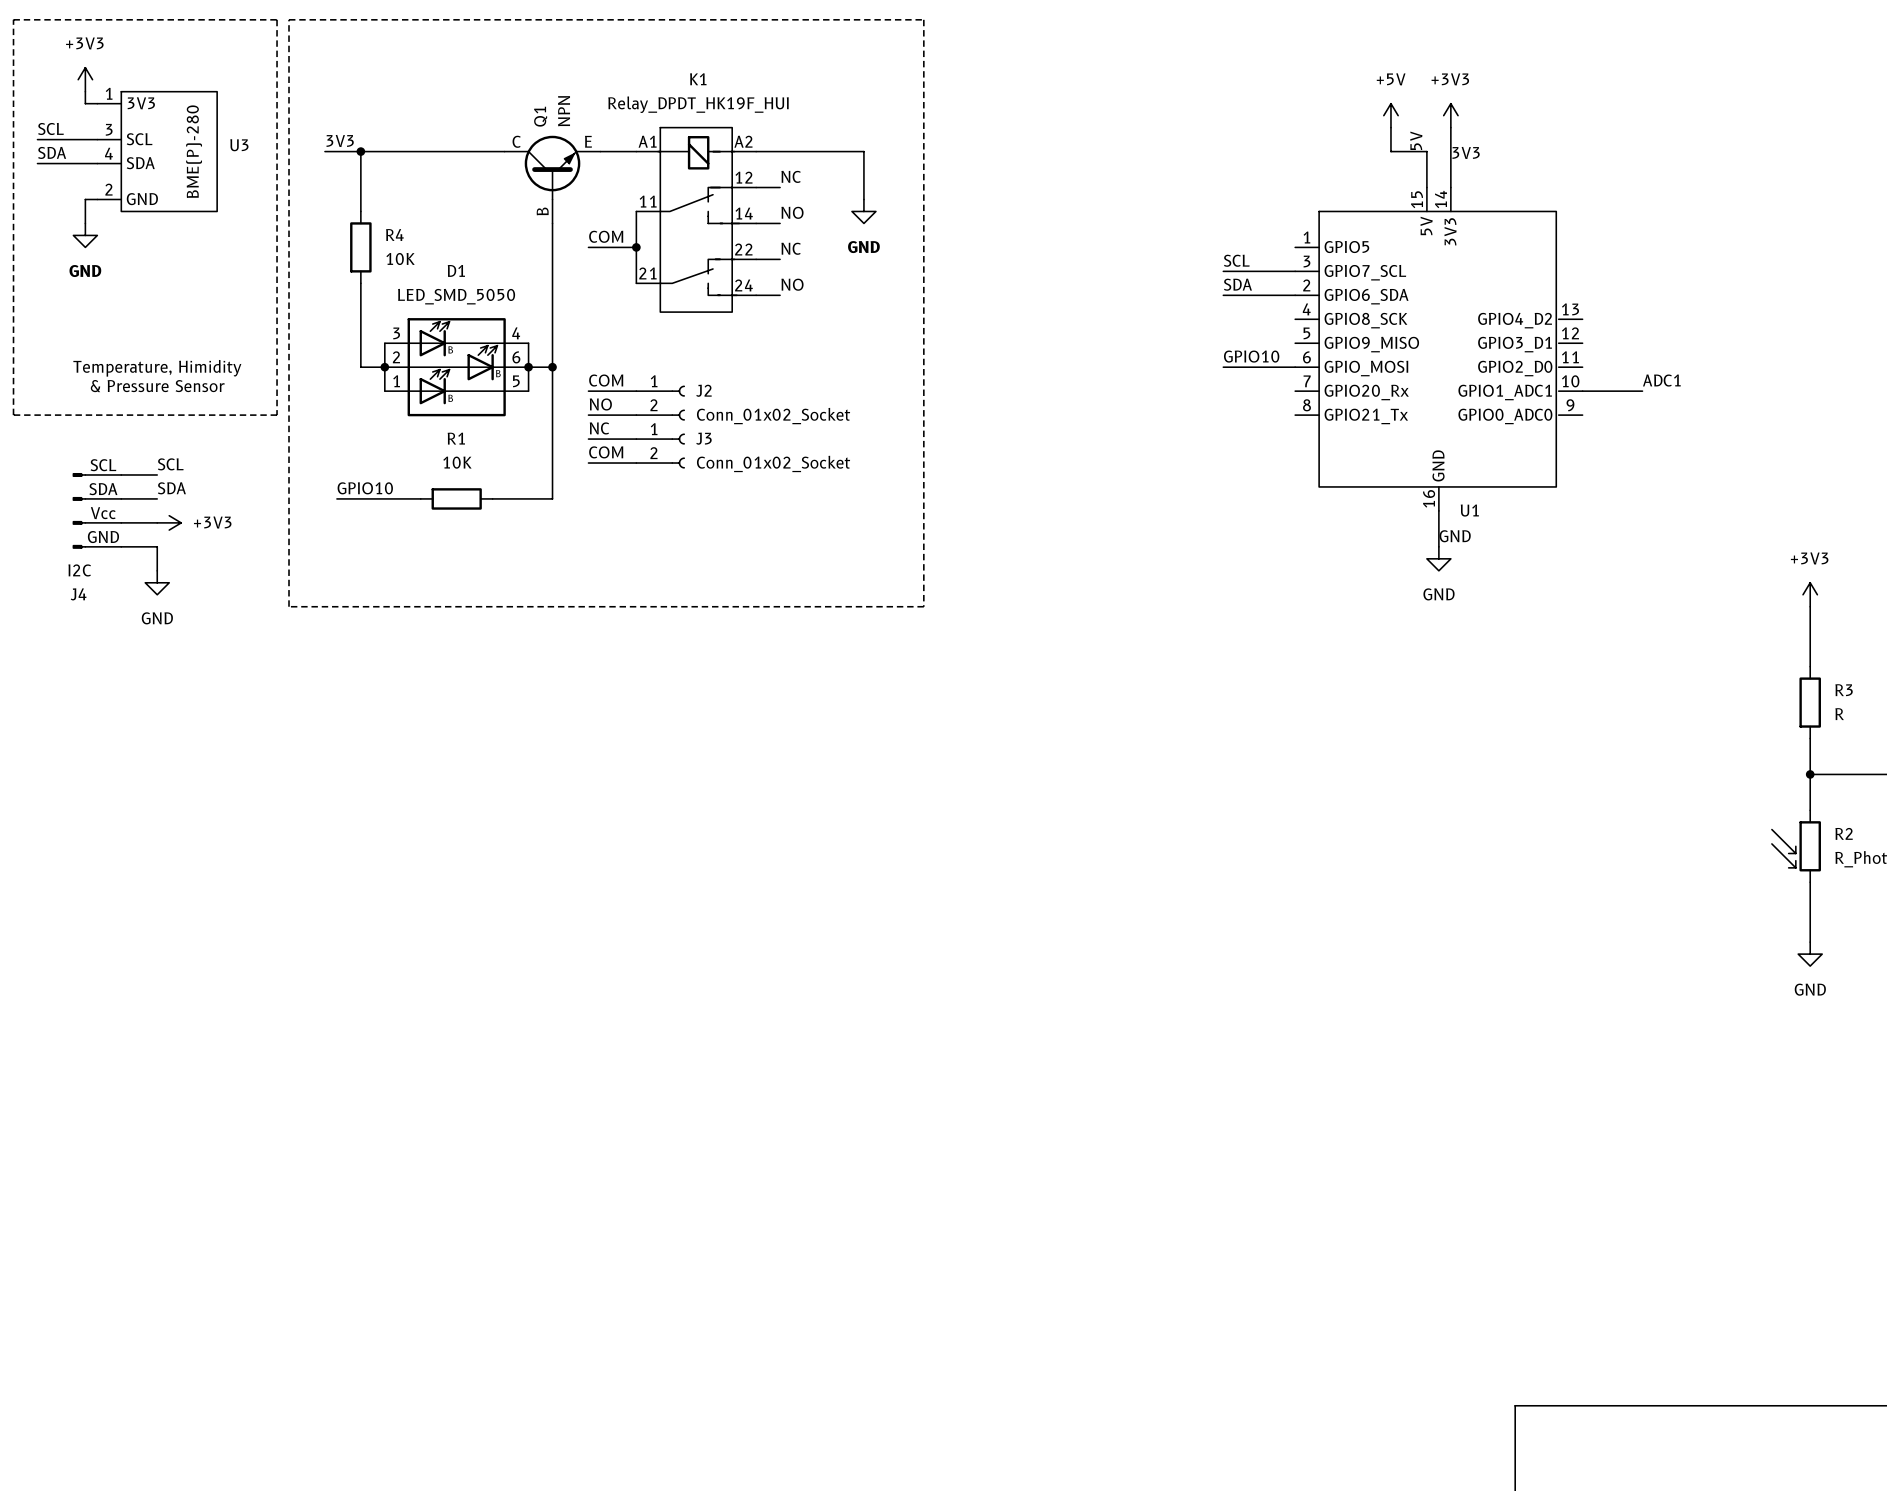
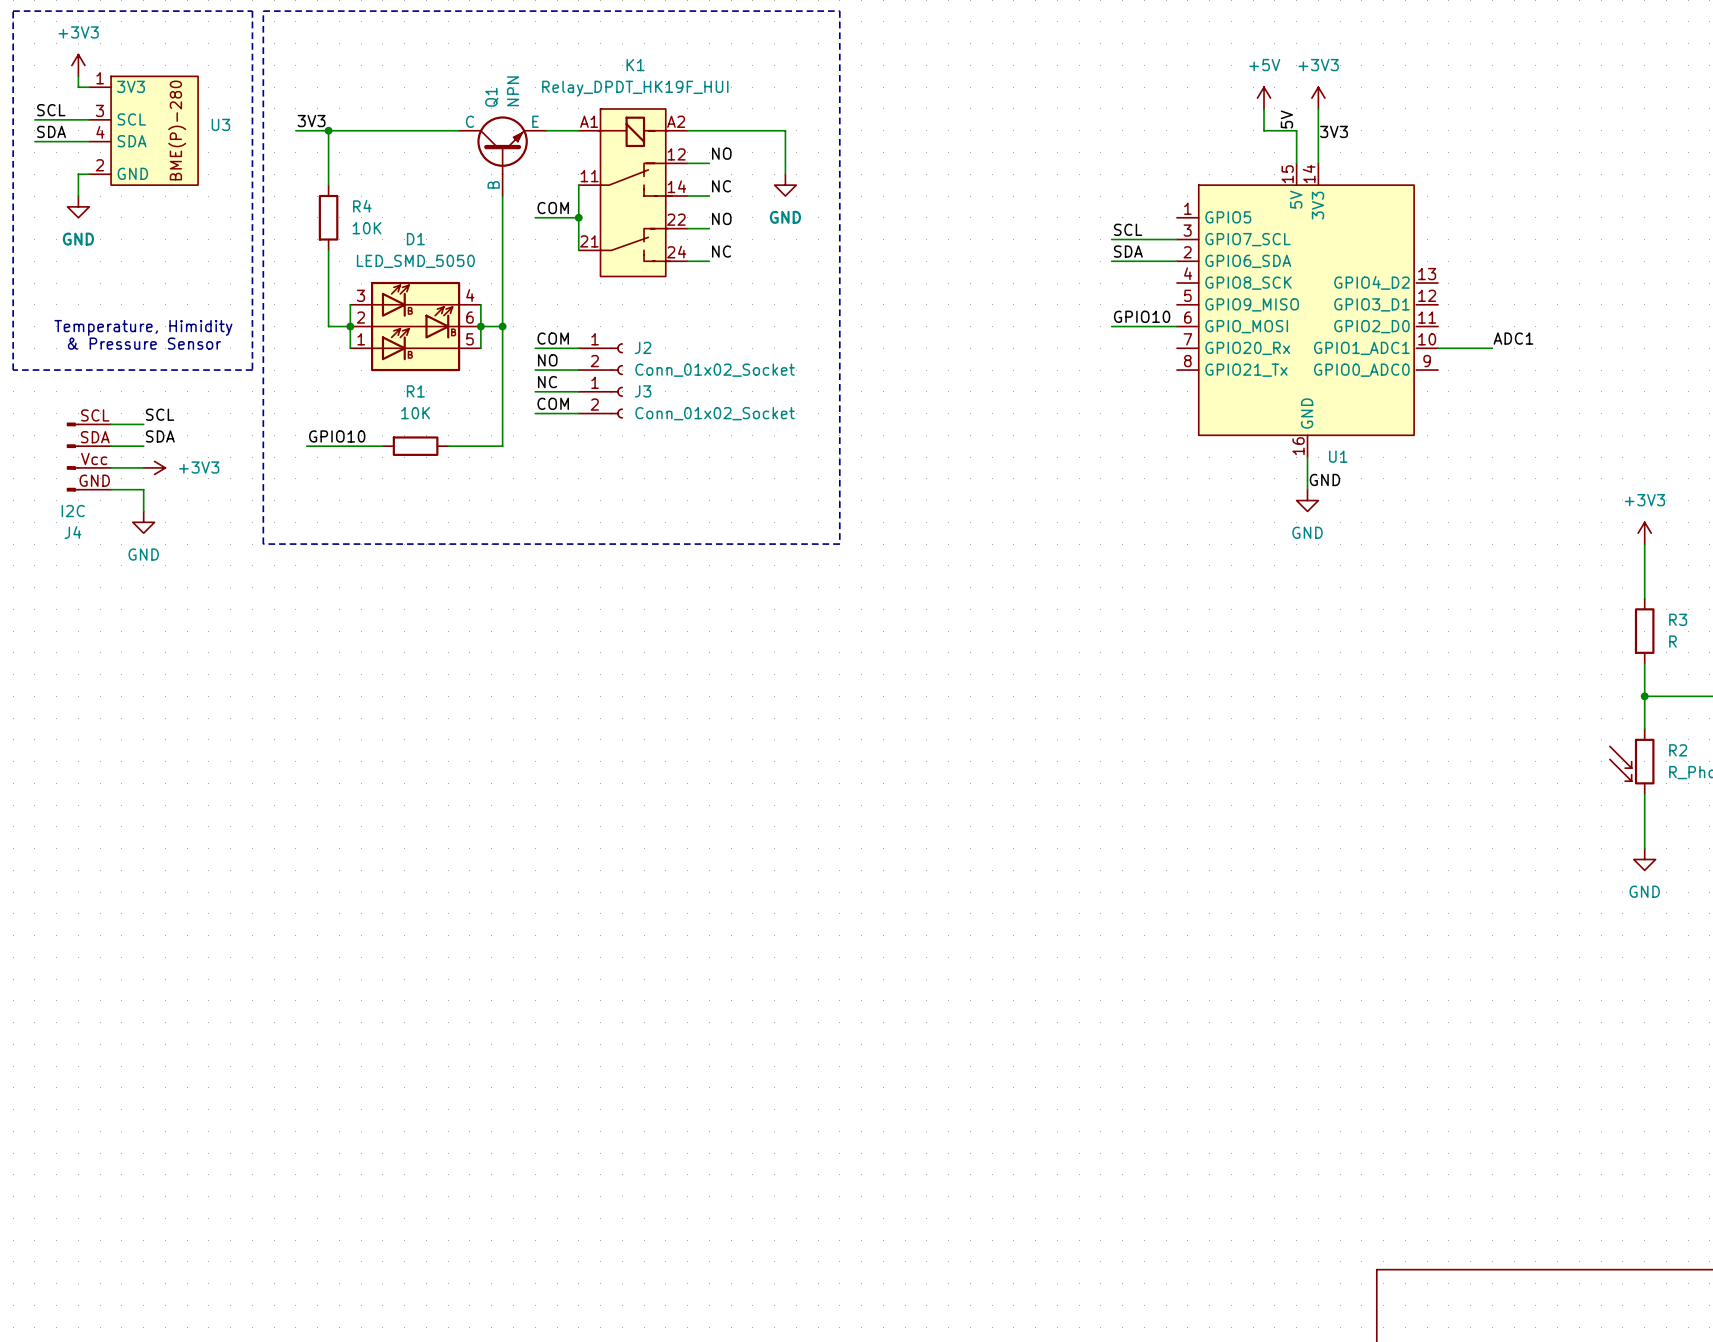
label: NC (791, 176) -> NO (721, 153)
label: NO (792, 212) -> NC (721, 186)
label: NC (791, 248) -> NO (721, 218)
label: NO (792, 284) -> NC (721, 251)

